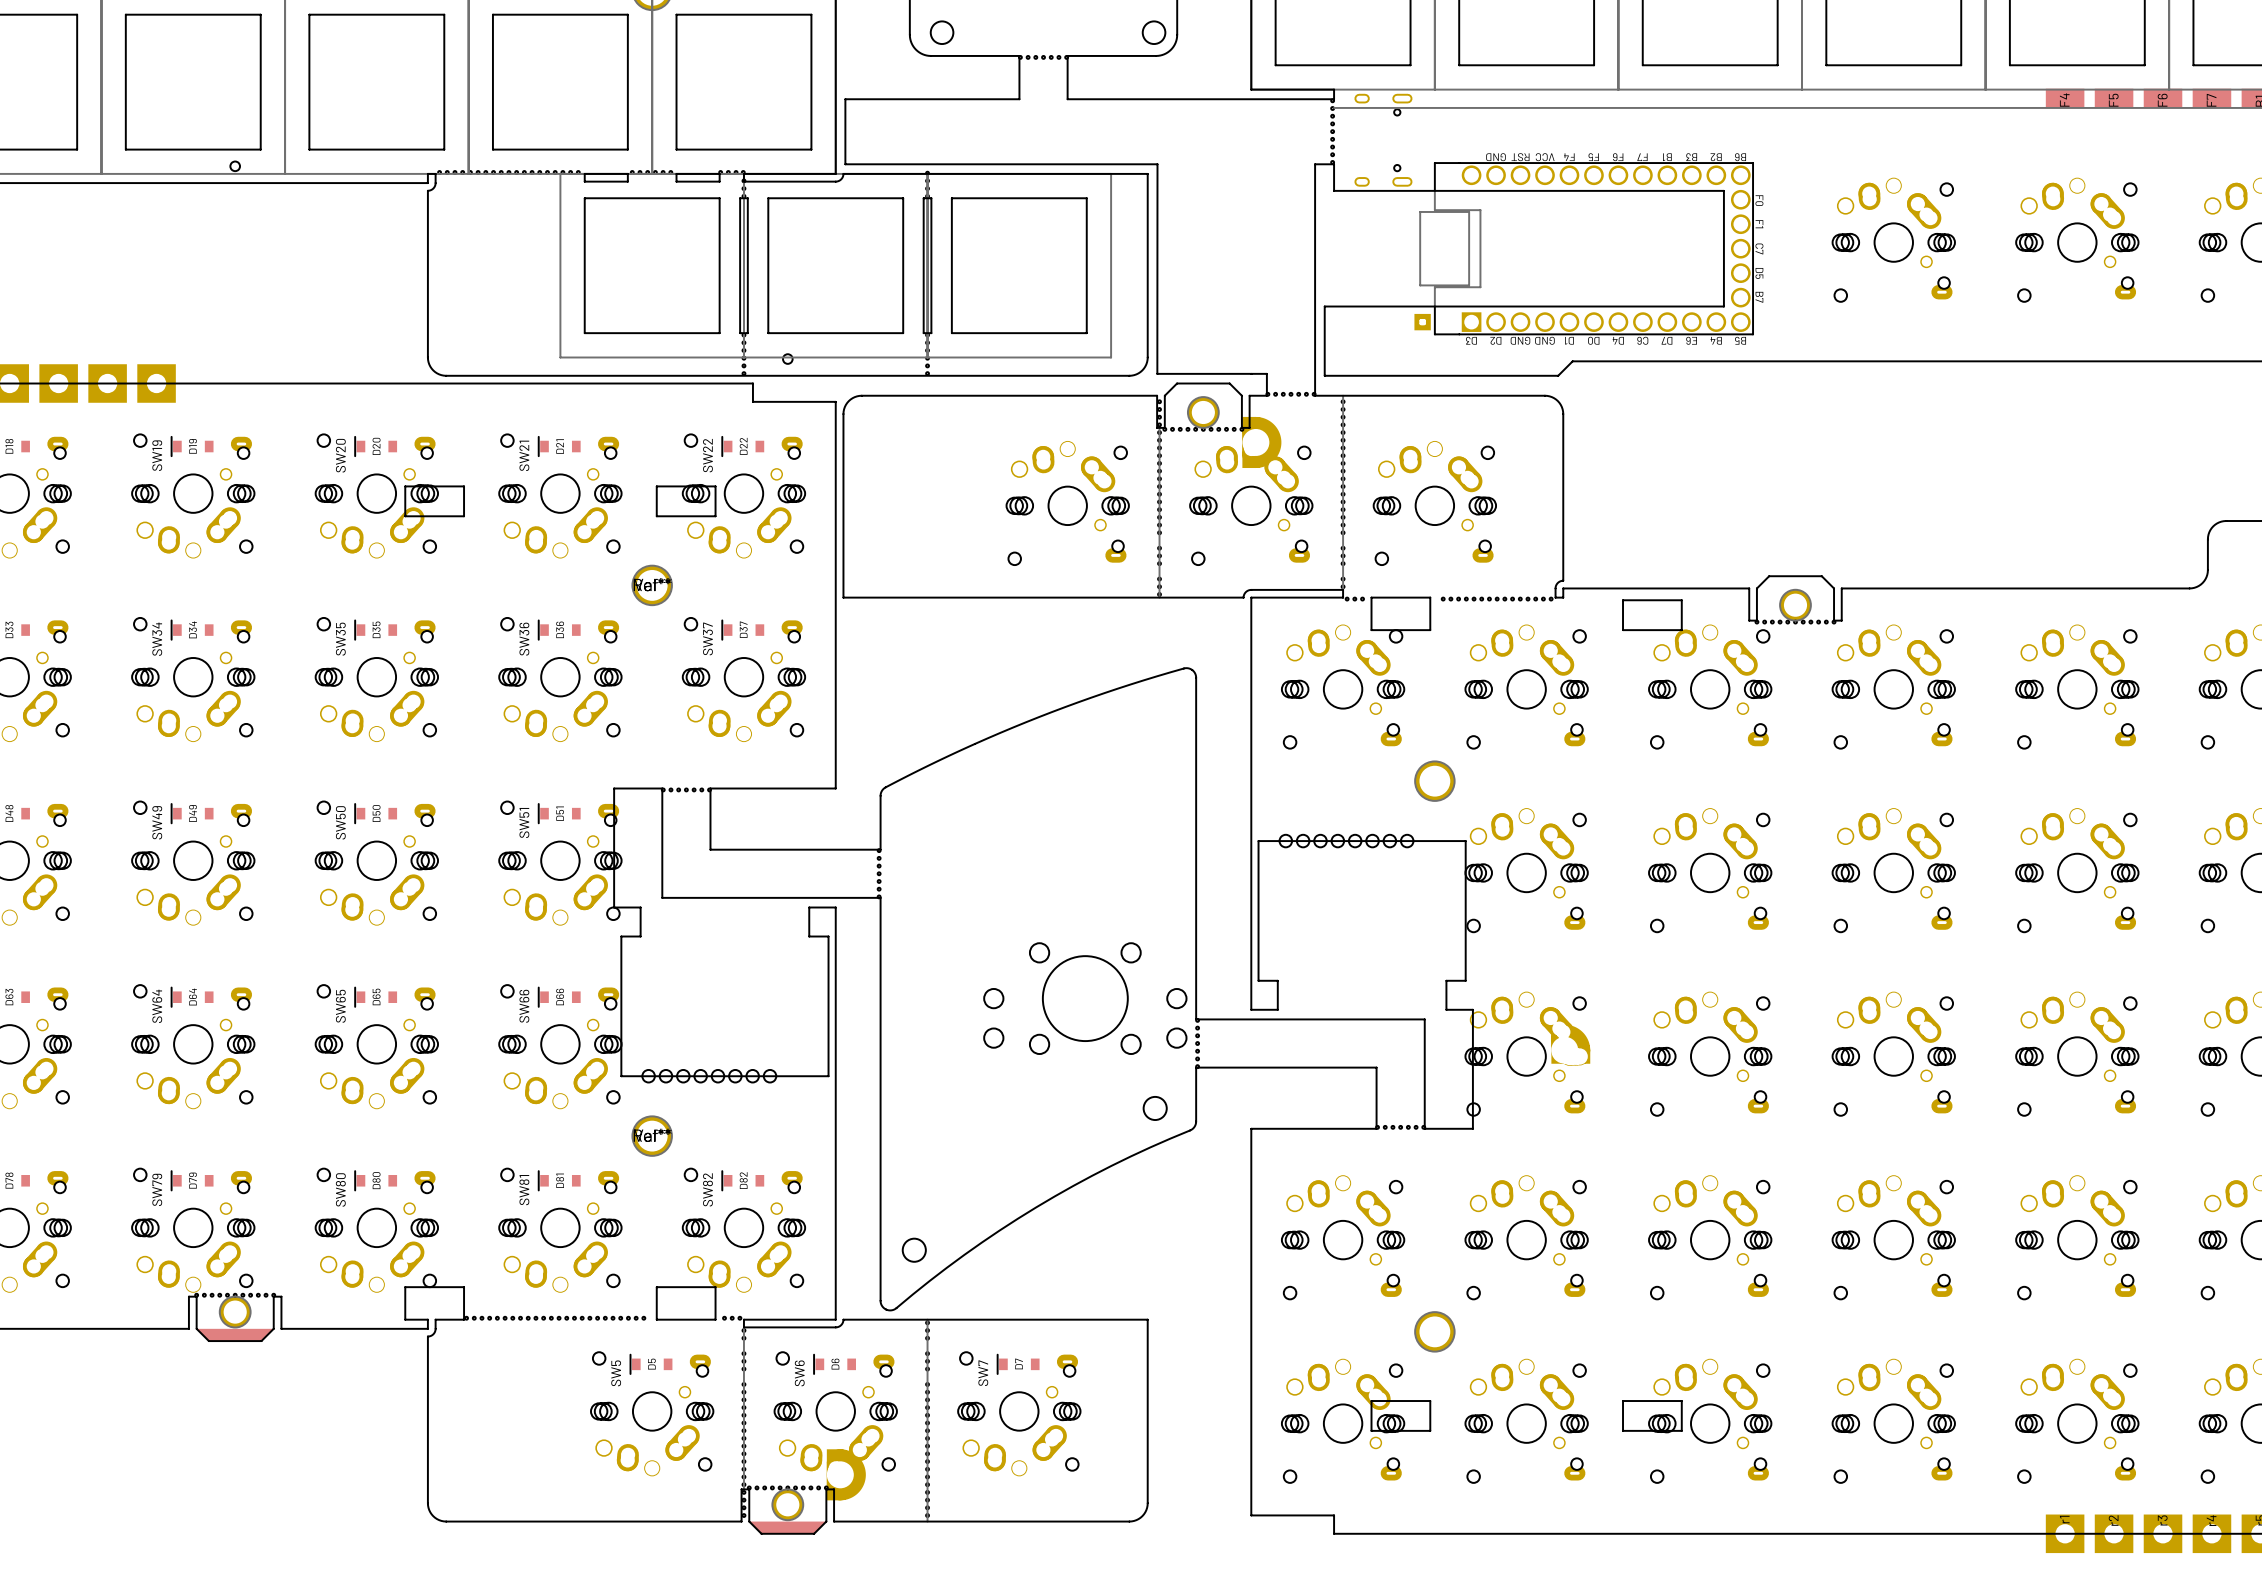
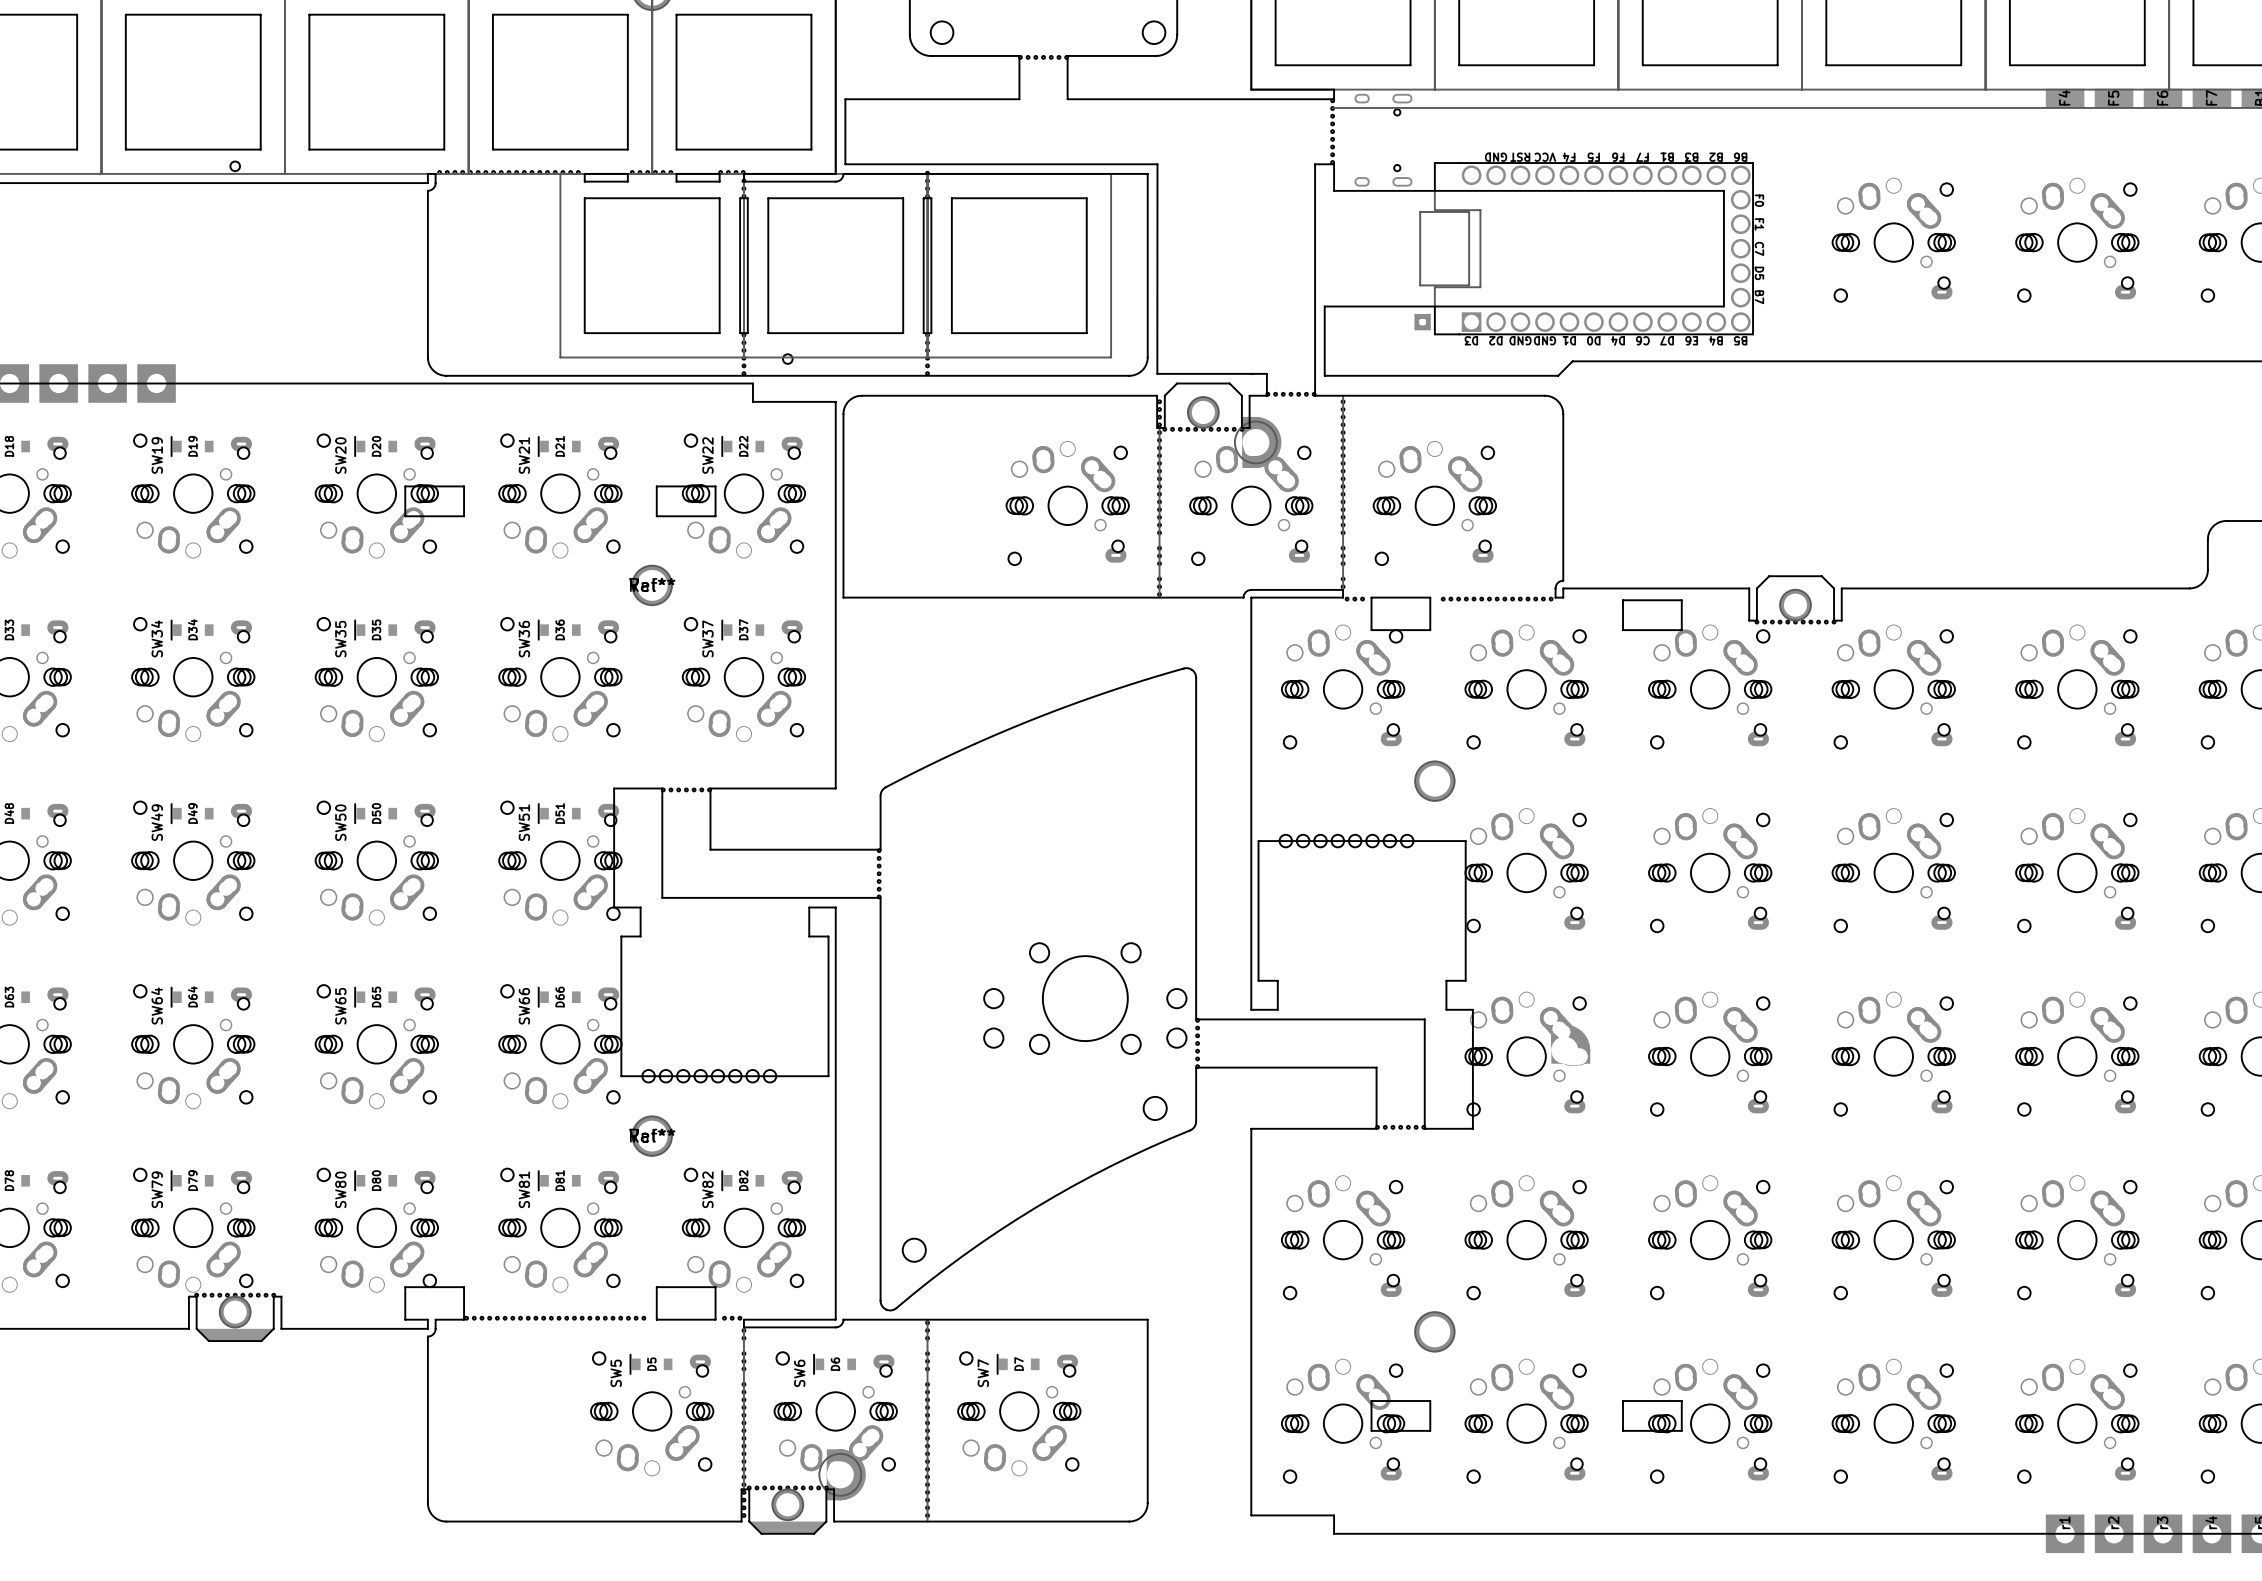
part footprint: [1242, 416, 1282, 469] -> [1234, 416, 1282, 469]
part footprint: [826, 1449, 866, 1501] -> [818, 1449, 866, 1501]

